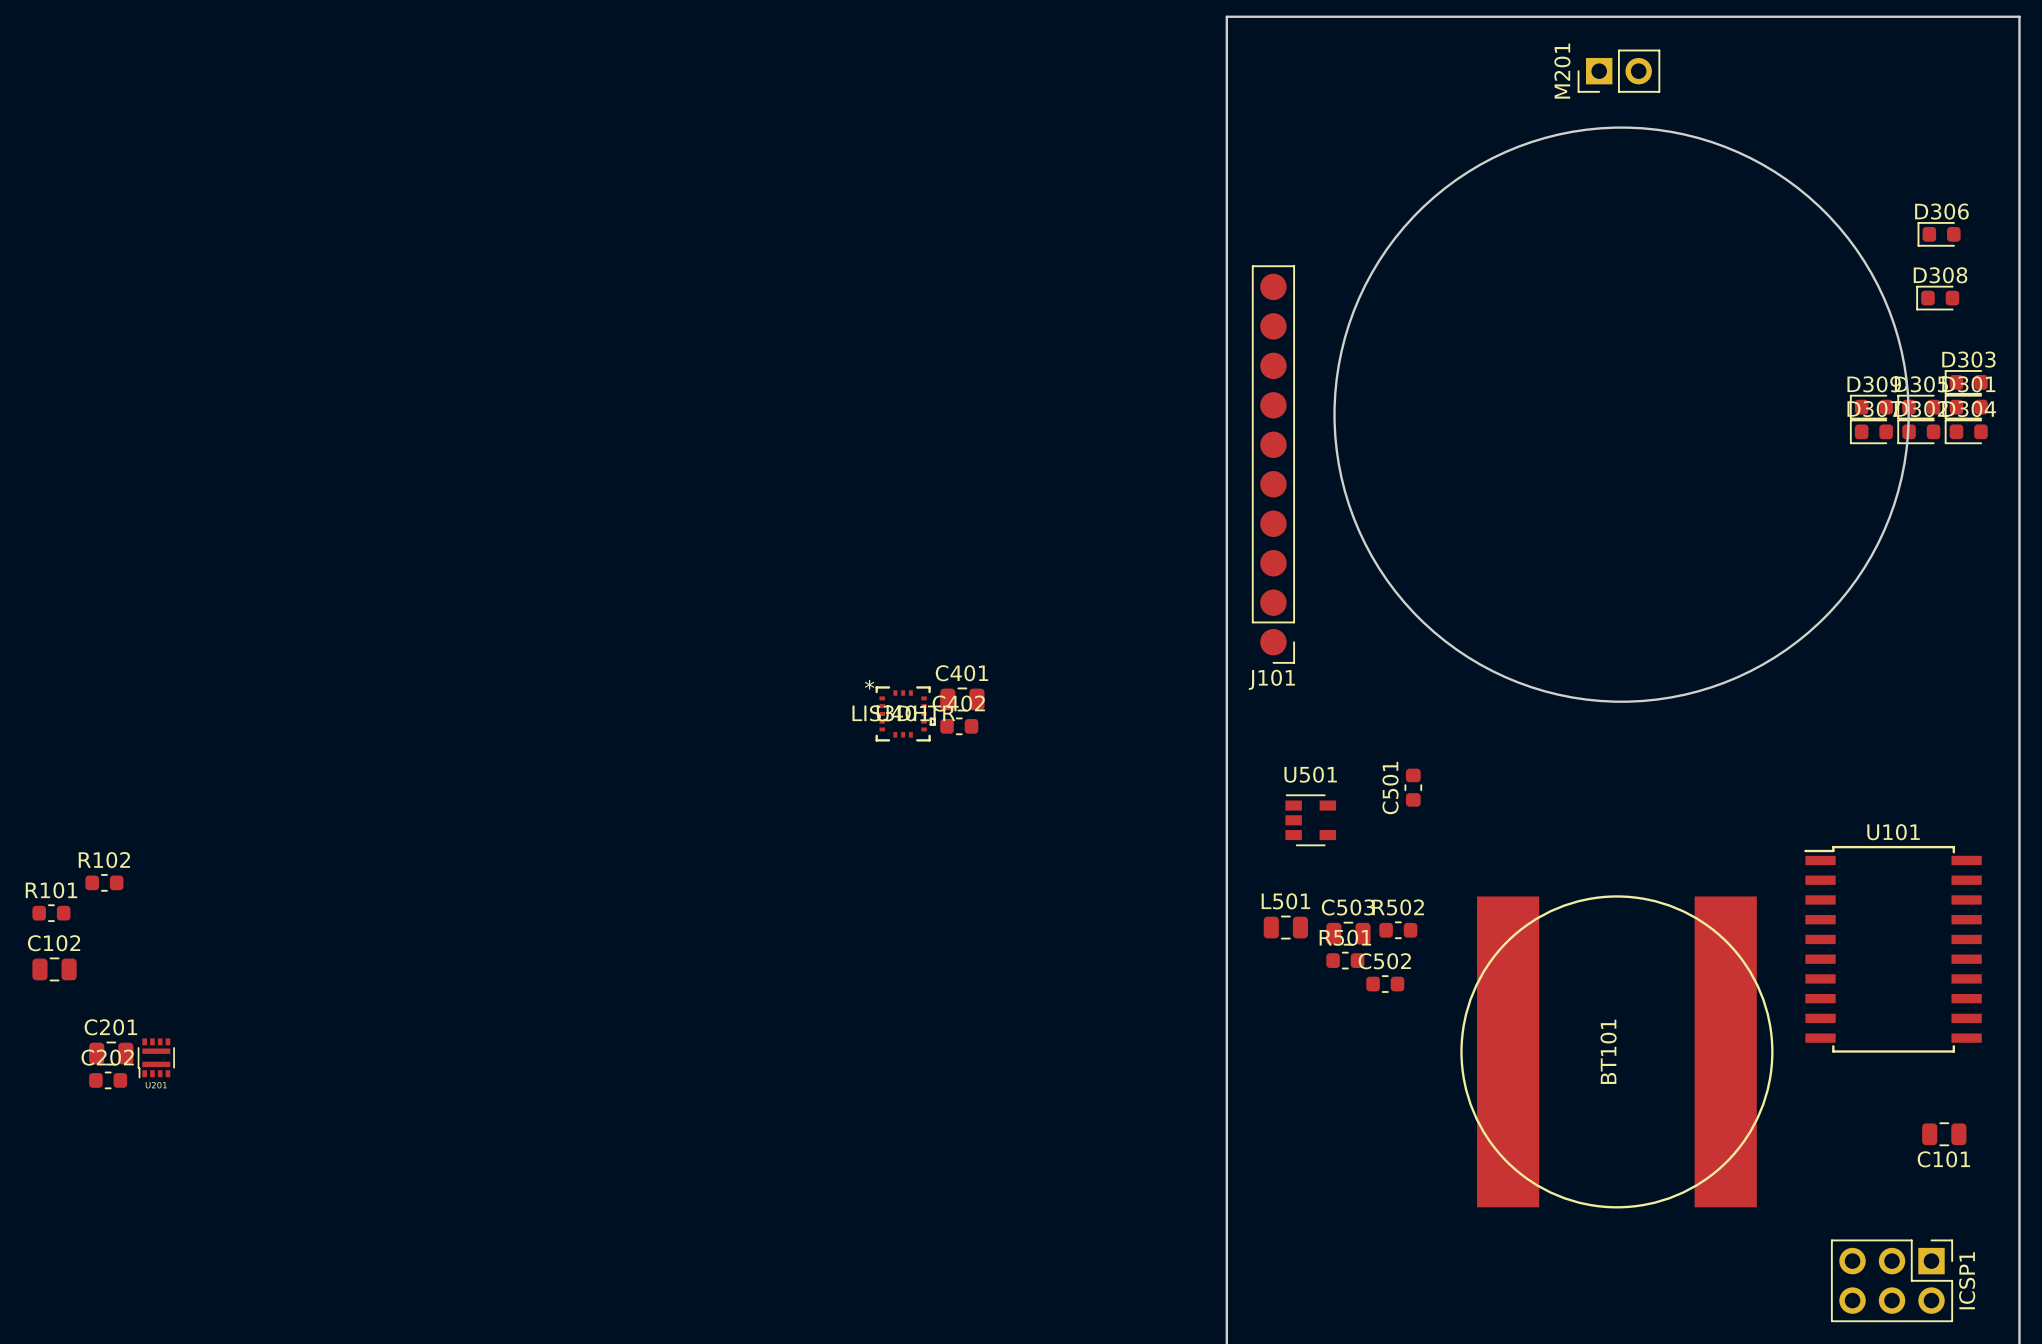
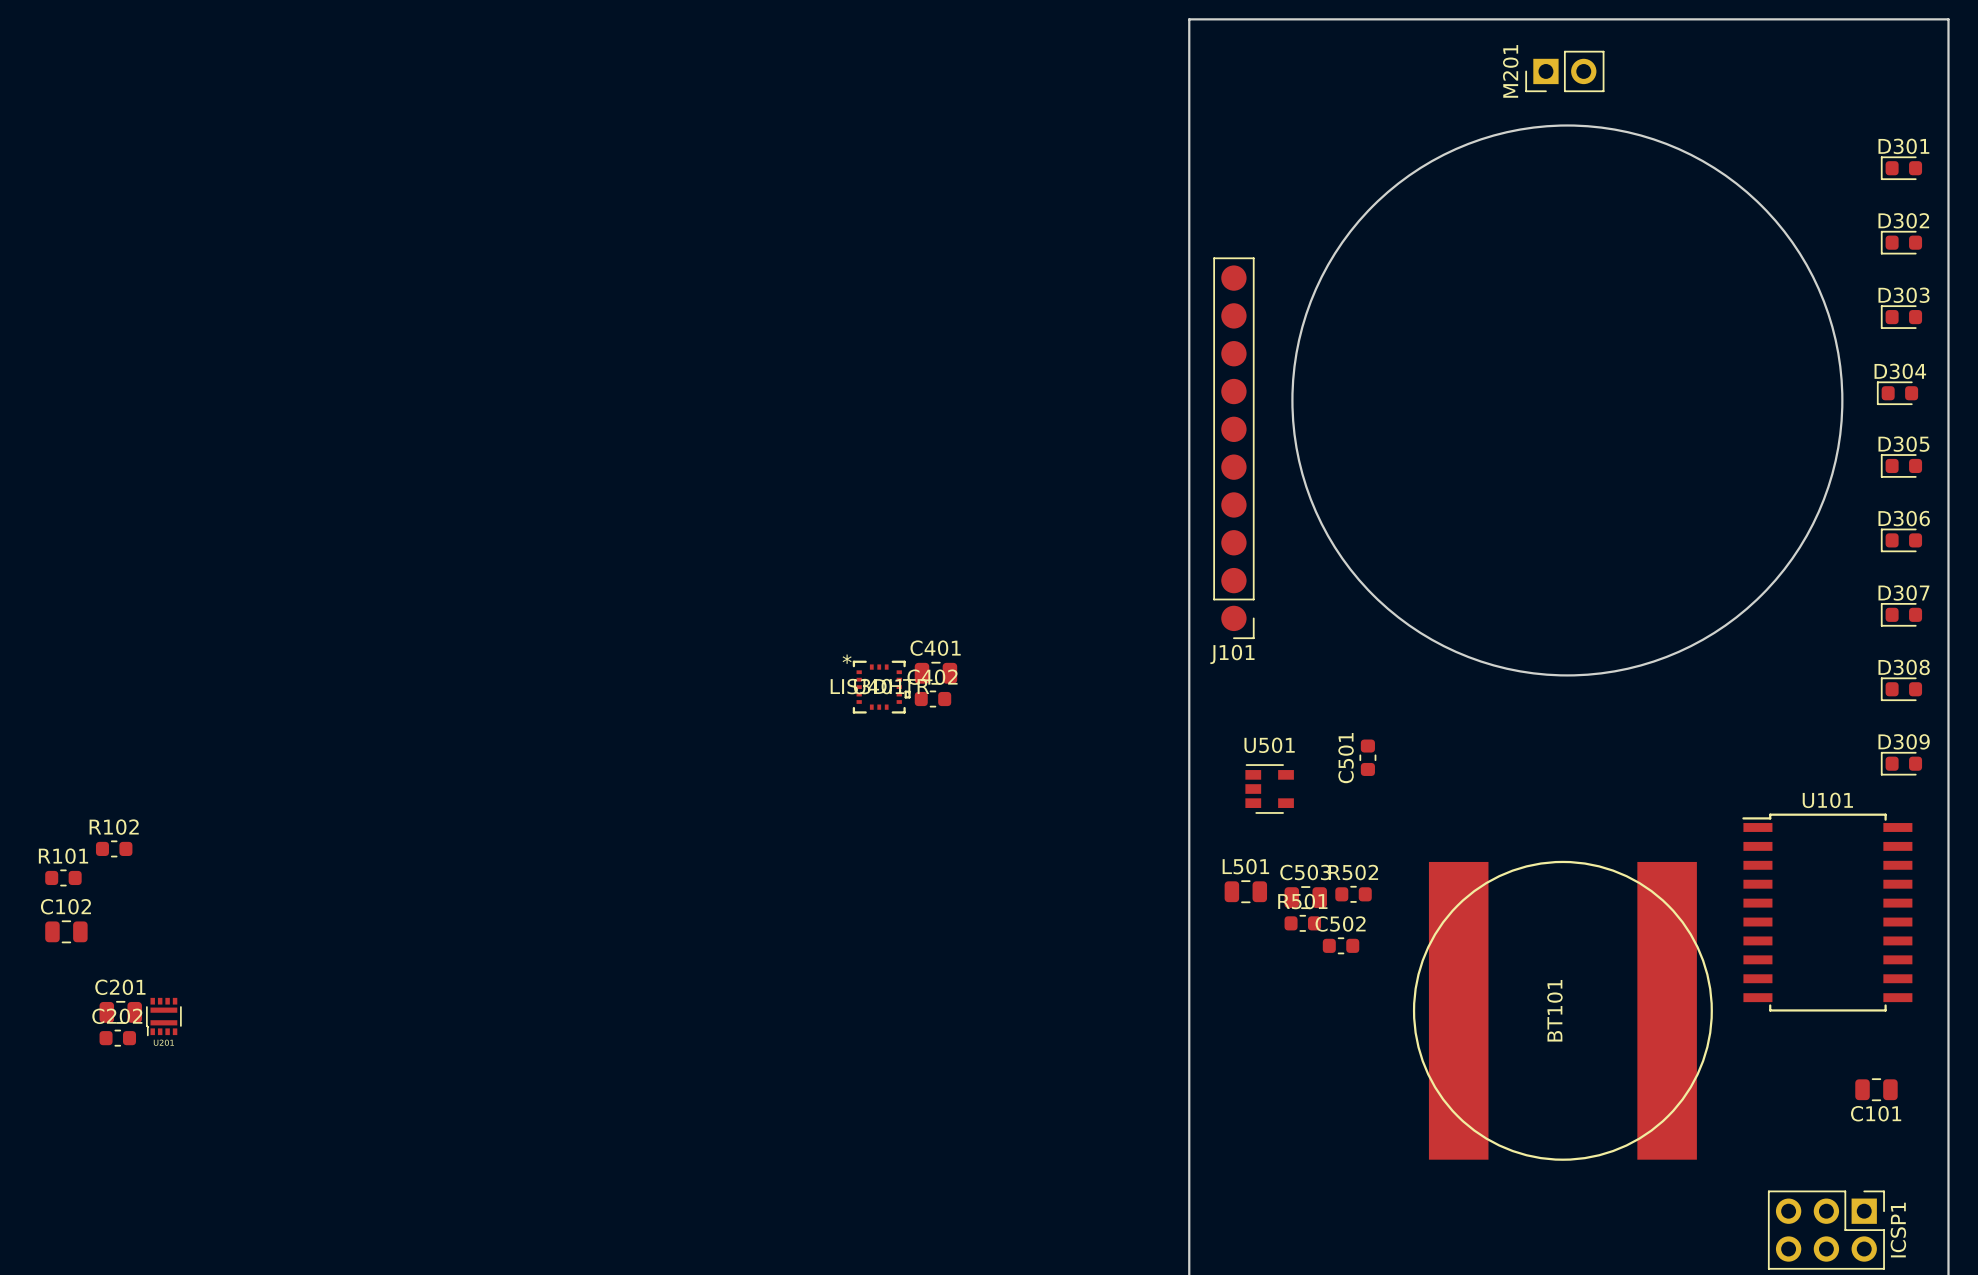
D301: none -> (1901, 168)
D306 position: (1939, 234) -> (1901, 540)
D308 position: (1937, 298) -> (1901, 689)
D303 position: (1966, 382) -> (1901, 317)
D301 name: D301 (1968, 384) -> D304 (1900, 371)
D309 position: (1871, 407) -> (1901, 763)
D305 position: (1918, 407) -> (1901, 465)
D307 position: (1871, 431) -> (1901, 614)
D302 position: (1918, 431) -> (1901, 242)
D304: (1966, 431) -> none

